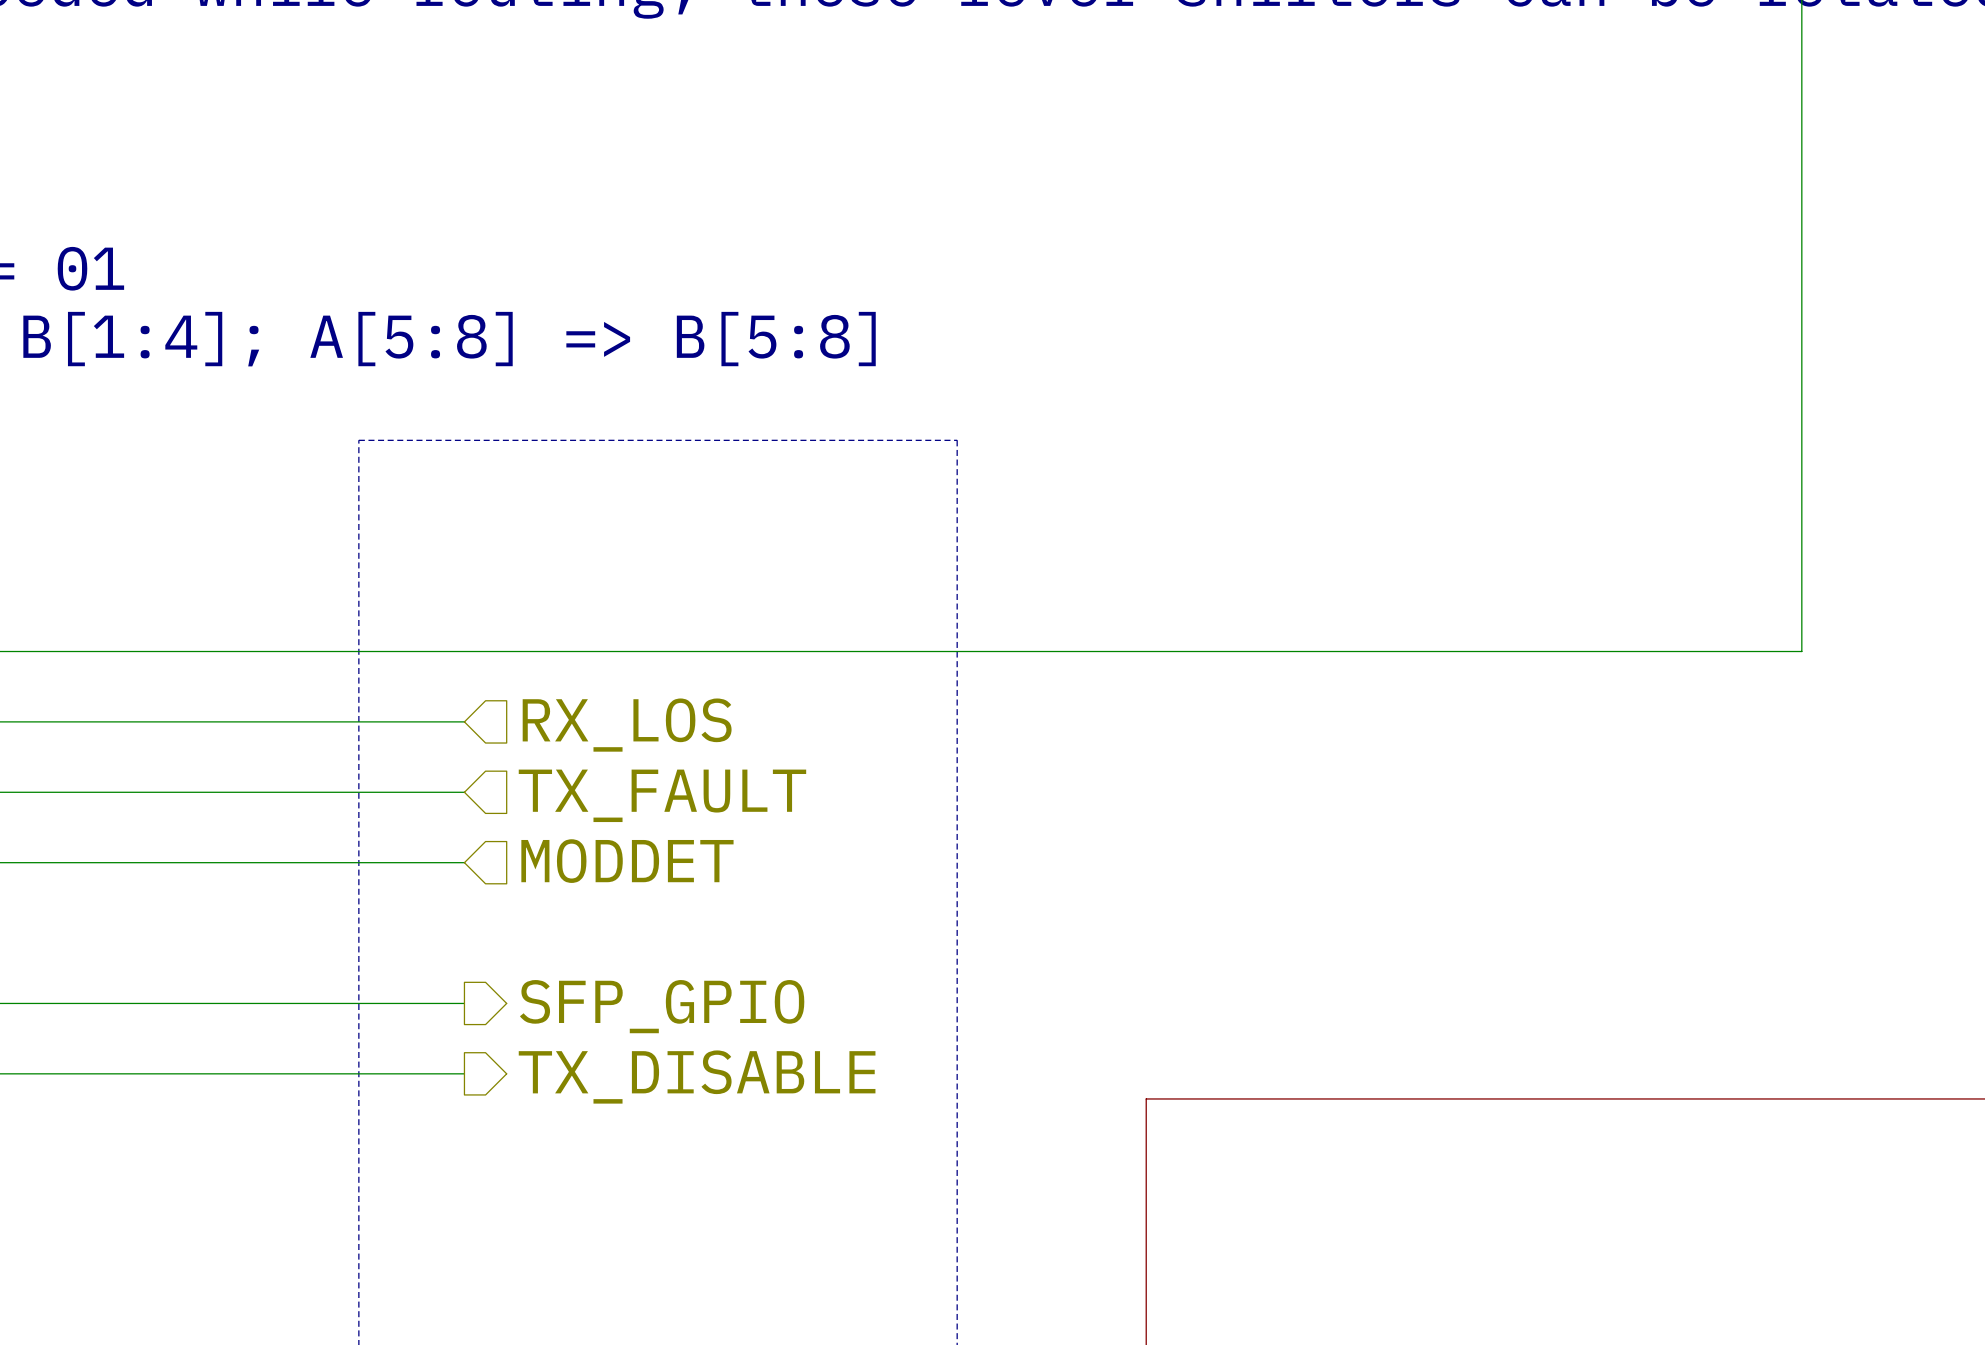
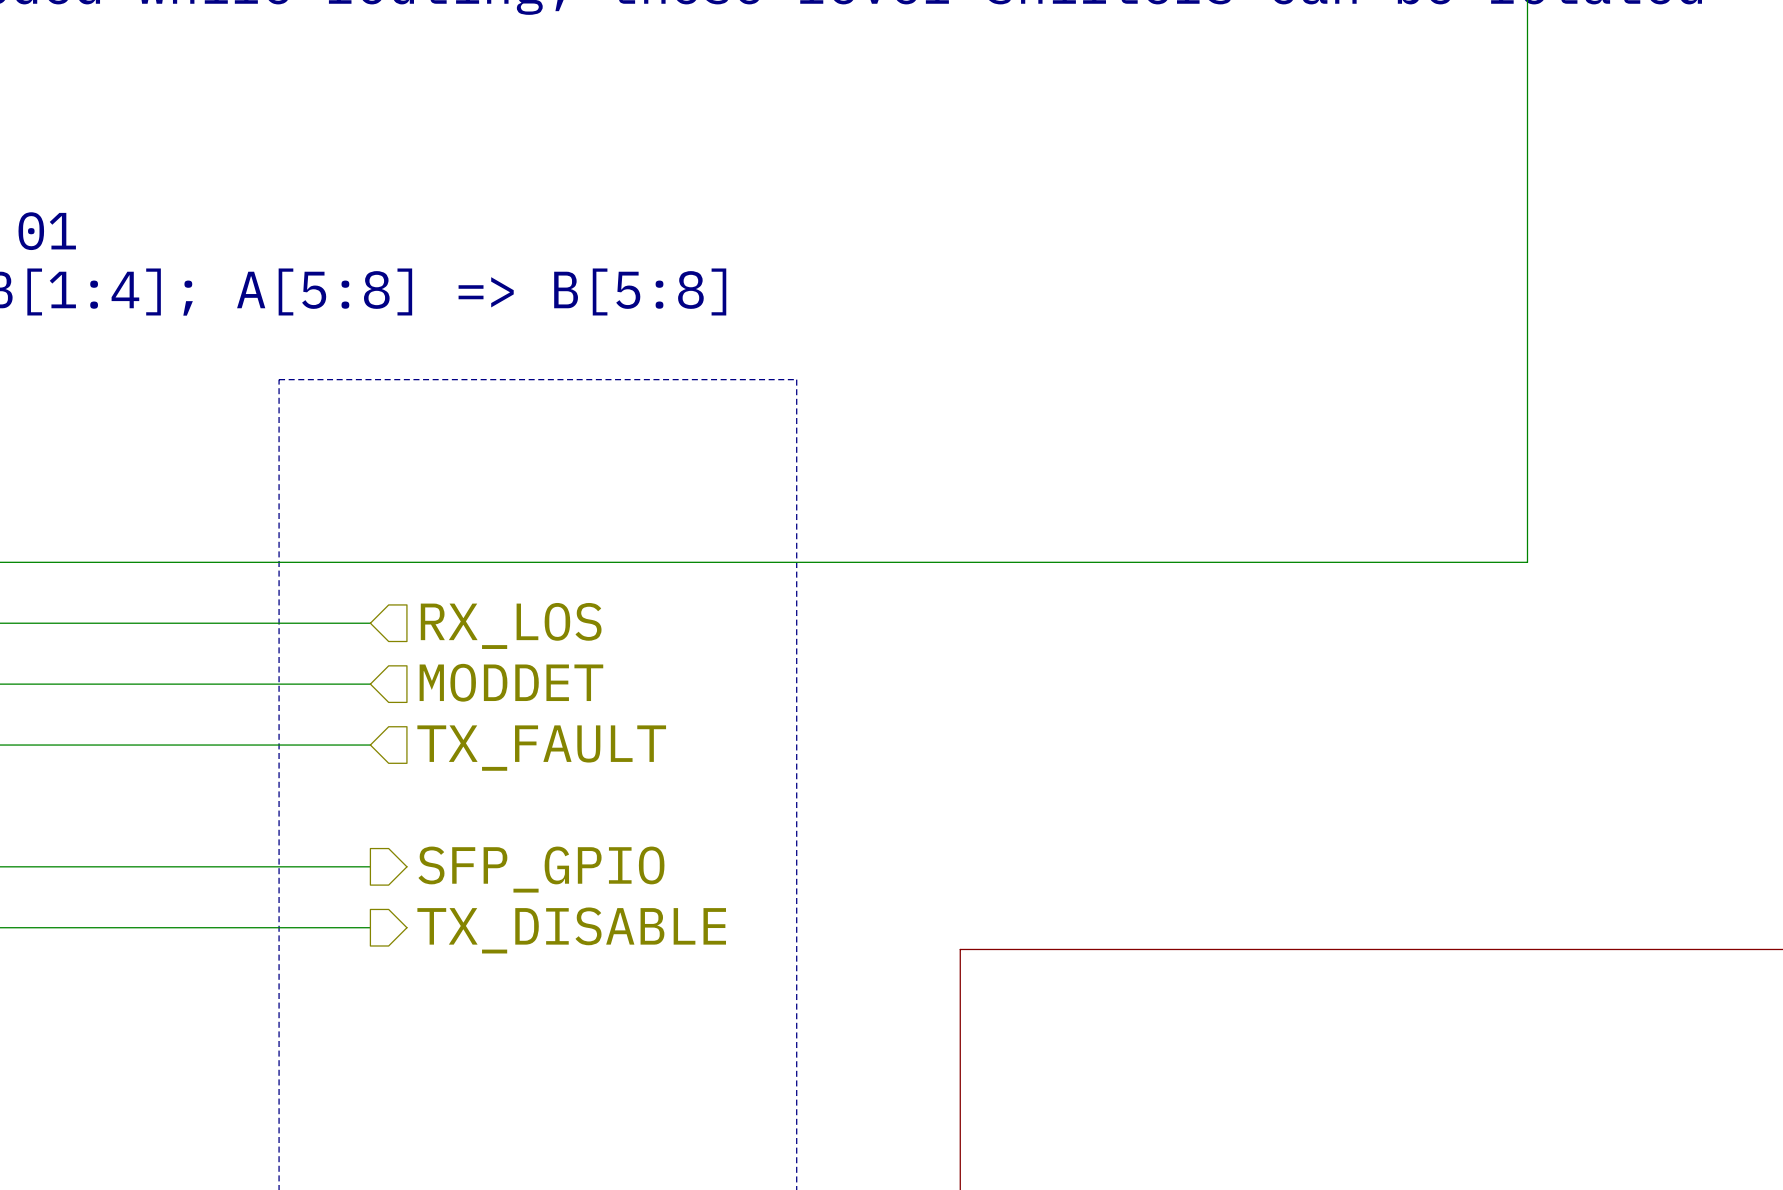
hierarchical label: TX_FAULT (662, 795) -> MODDET (511, 682)
hierarchical label: MODDET (627, 861) -> TX_FAULT (541, 748)

